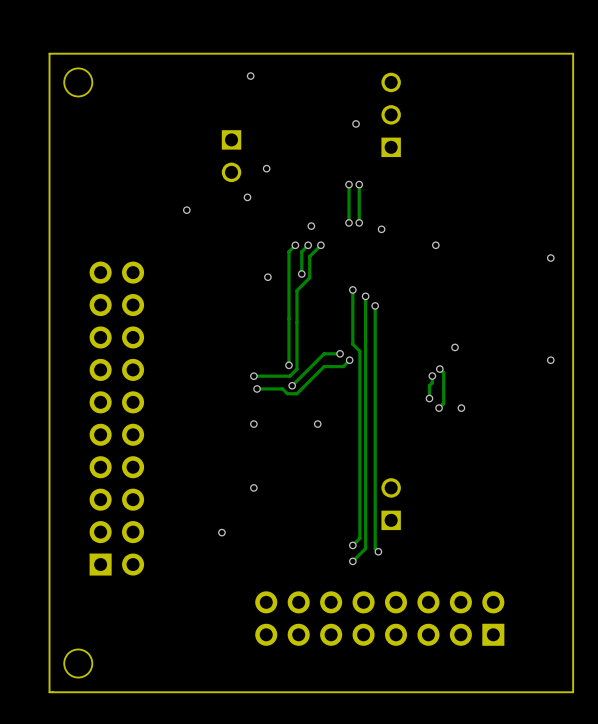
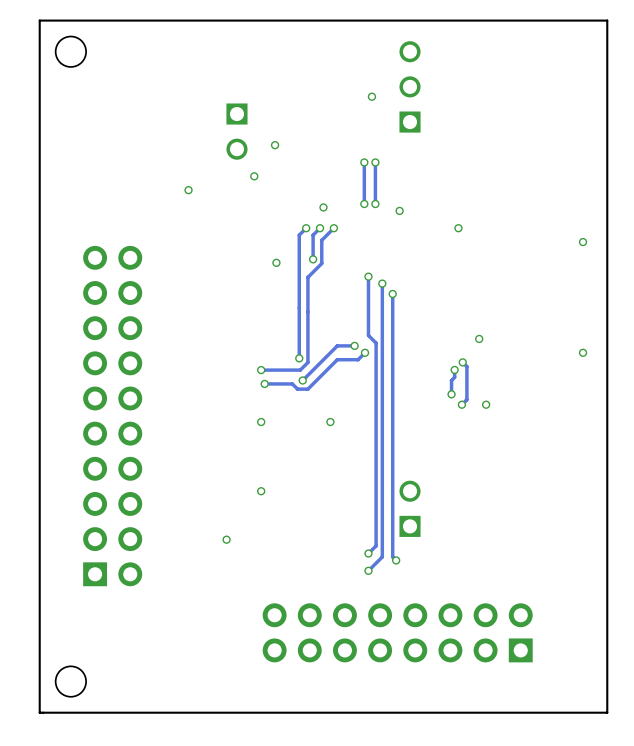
via: (250, 76) -> none

